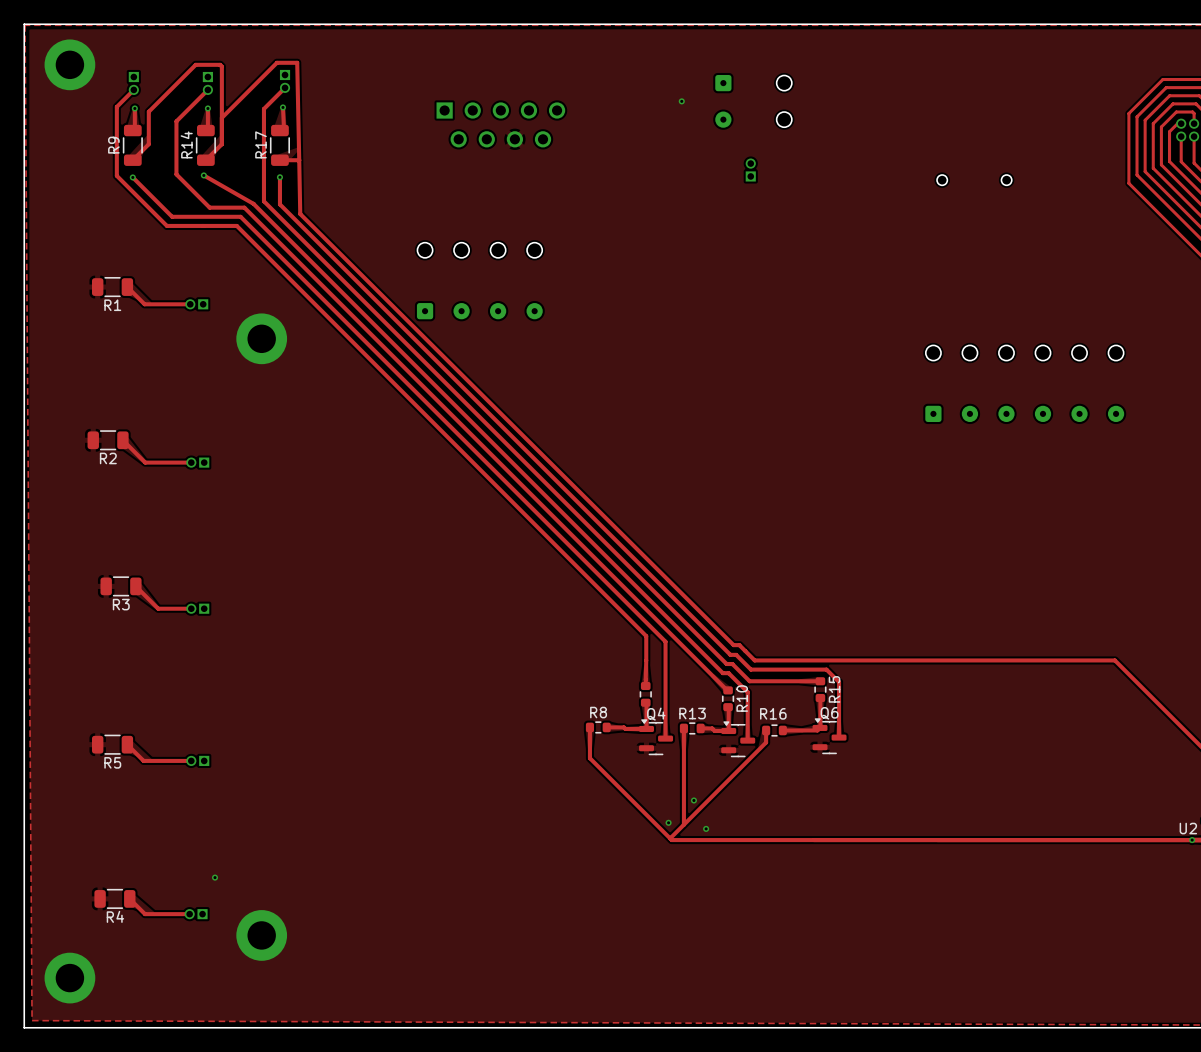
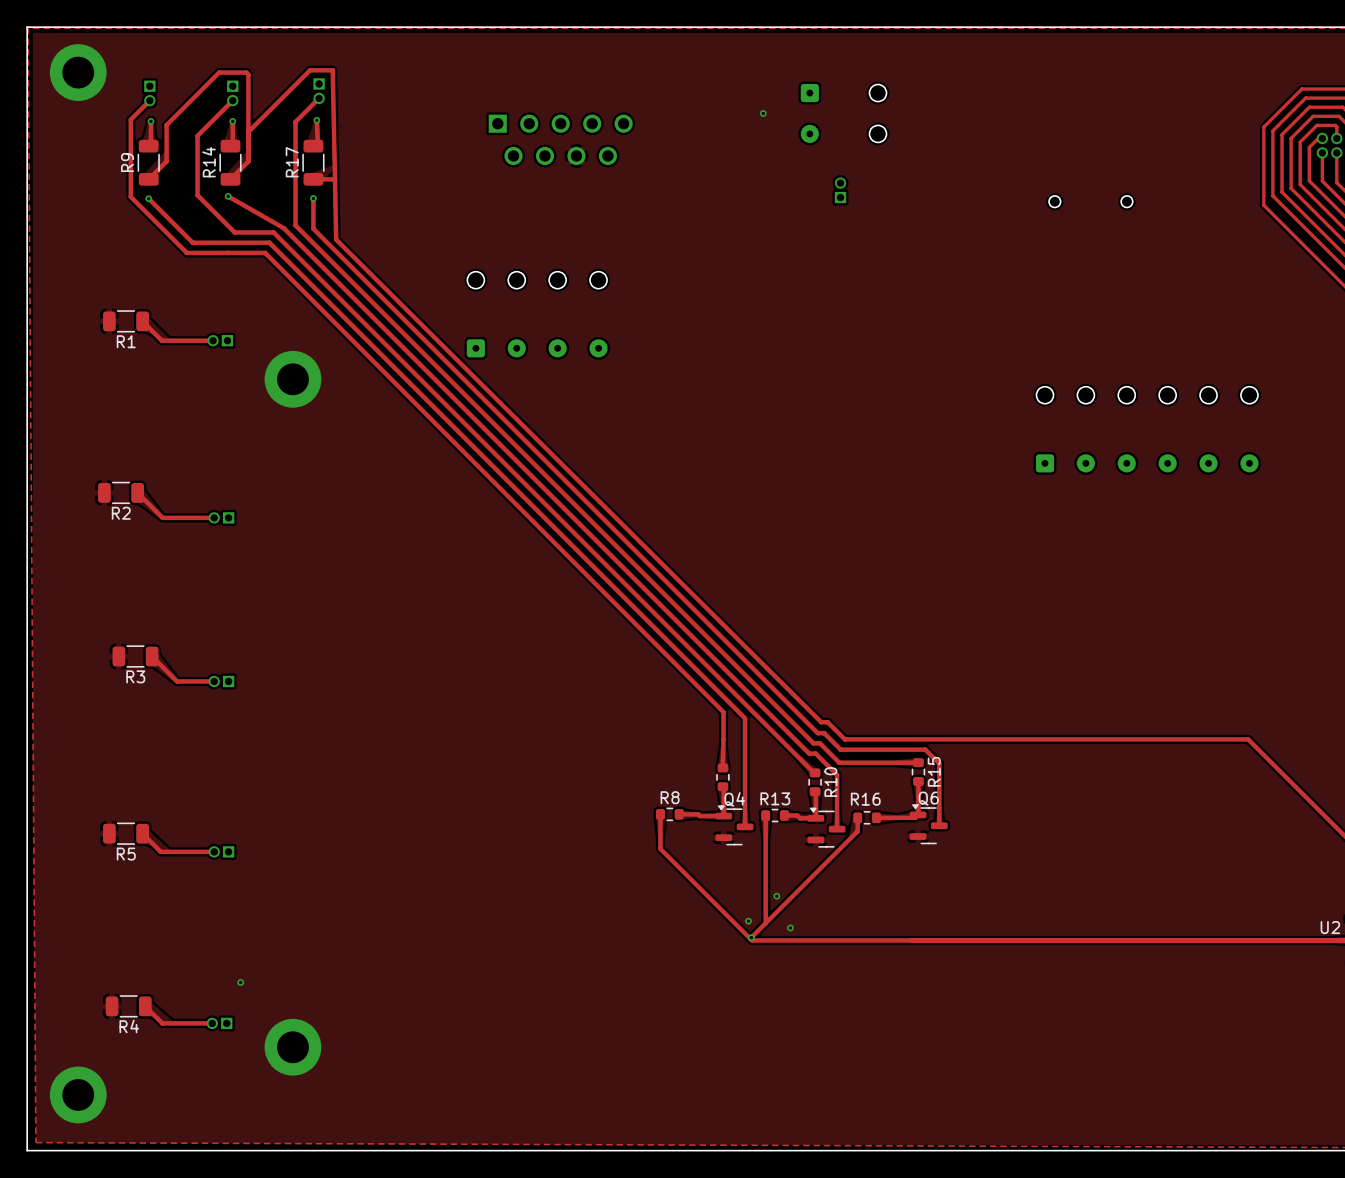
via: none -> (751, 937)
via: (1192, 840) -> none

